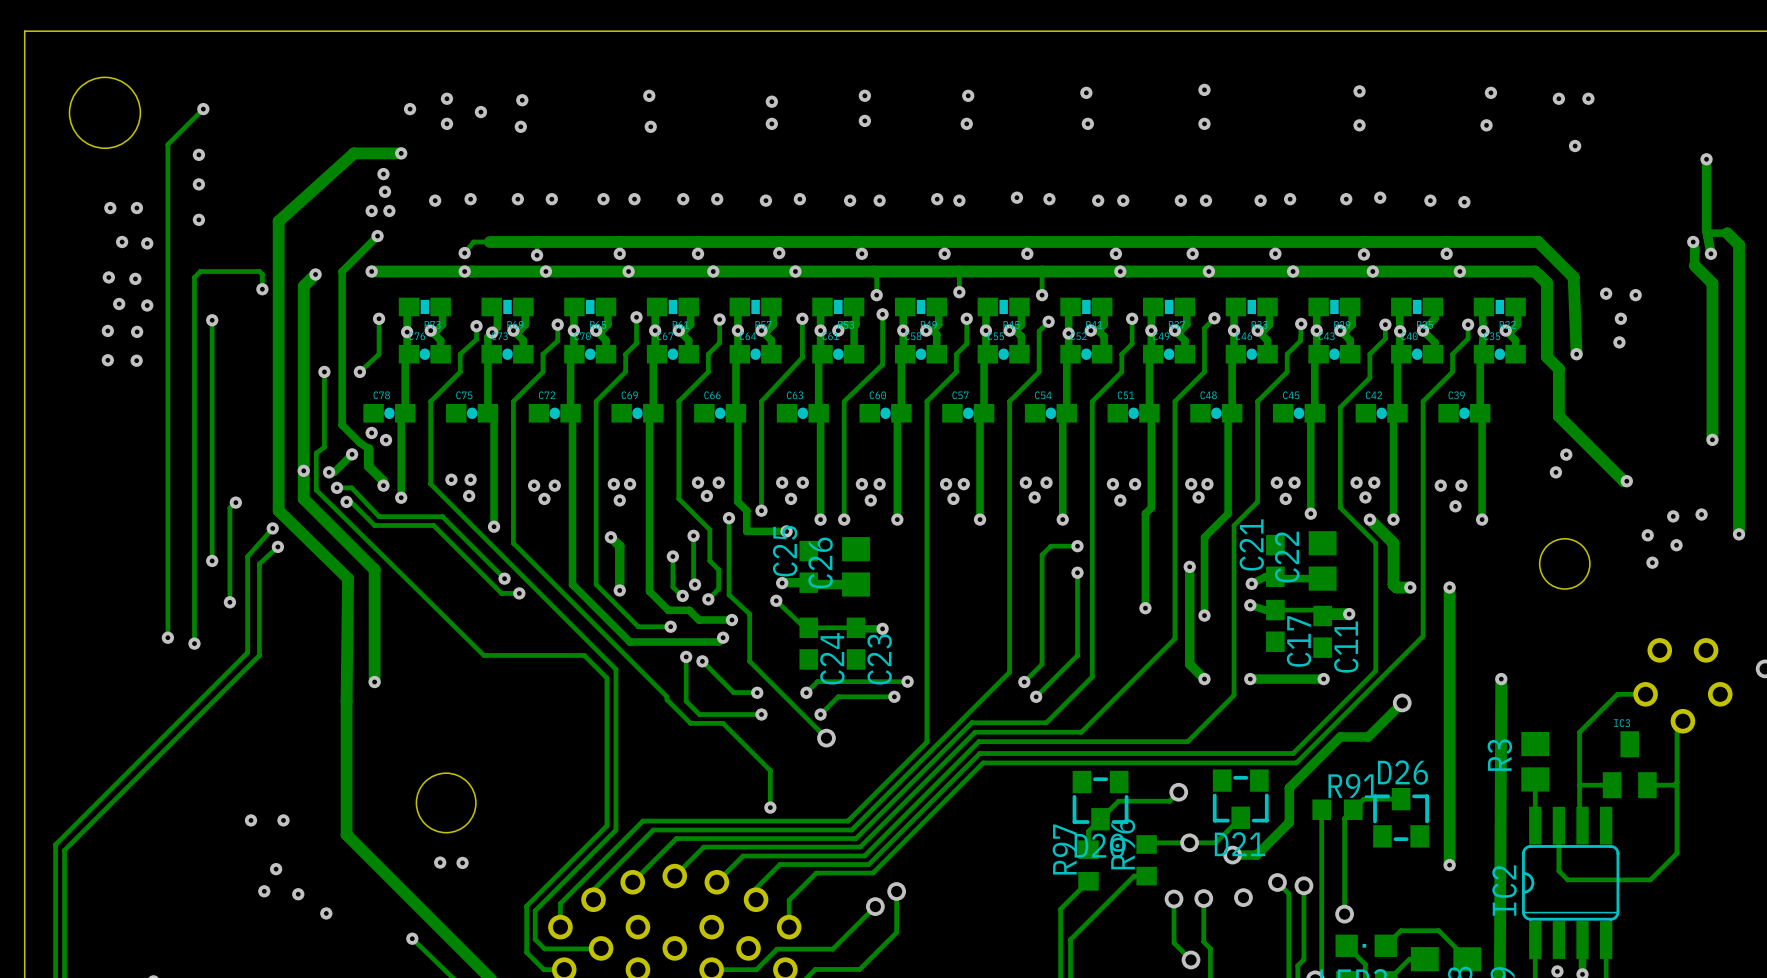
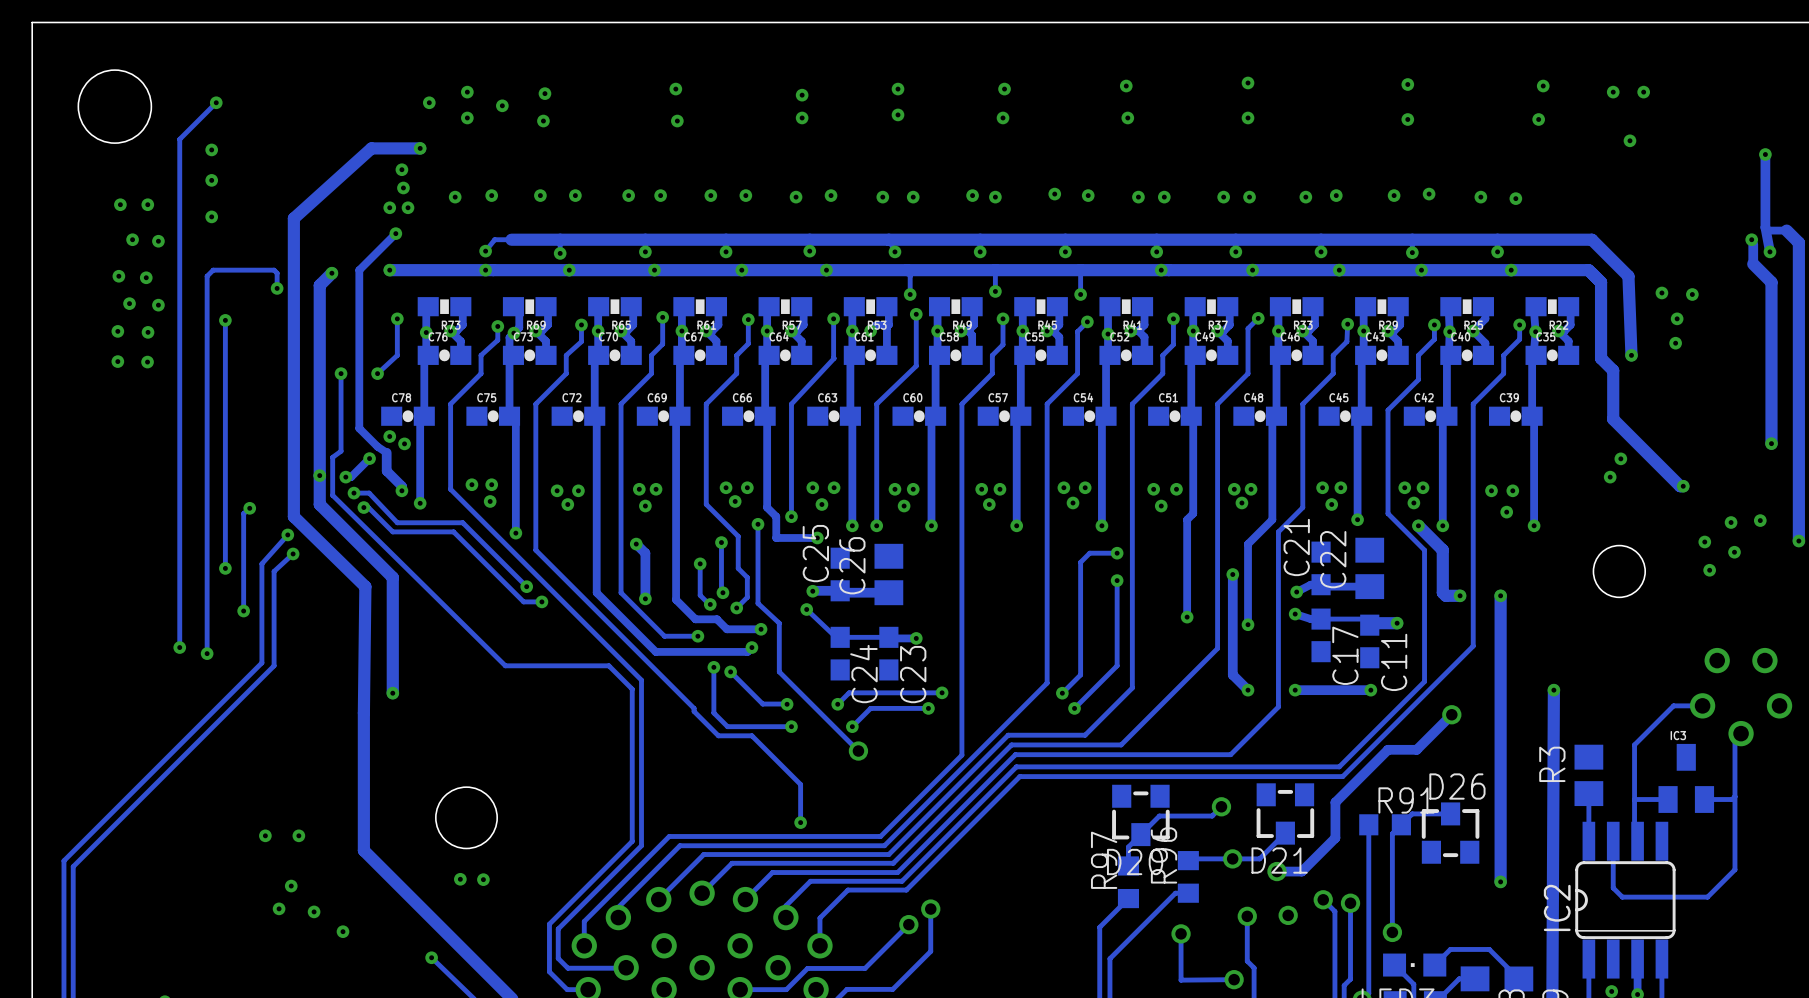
track: (1174, 899) (1174, 942) (1191, 959) -> (1181, 933) (1181, 980) (1234, 979)
via position: (1174, 899) -> (1181, 933)

